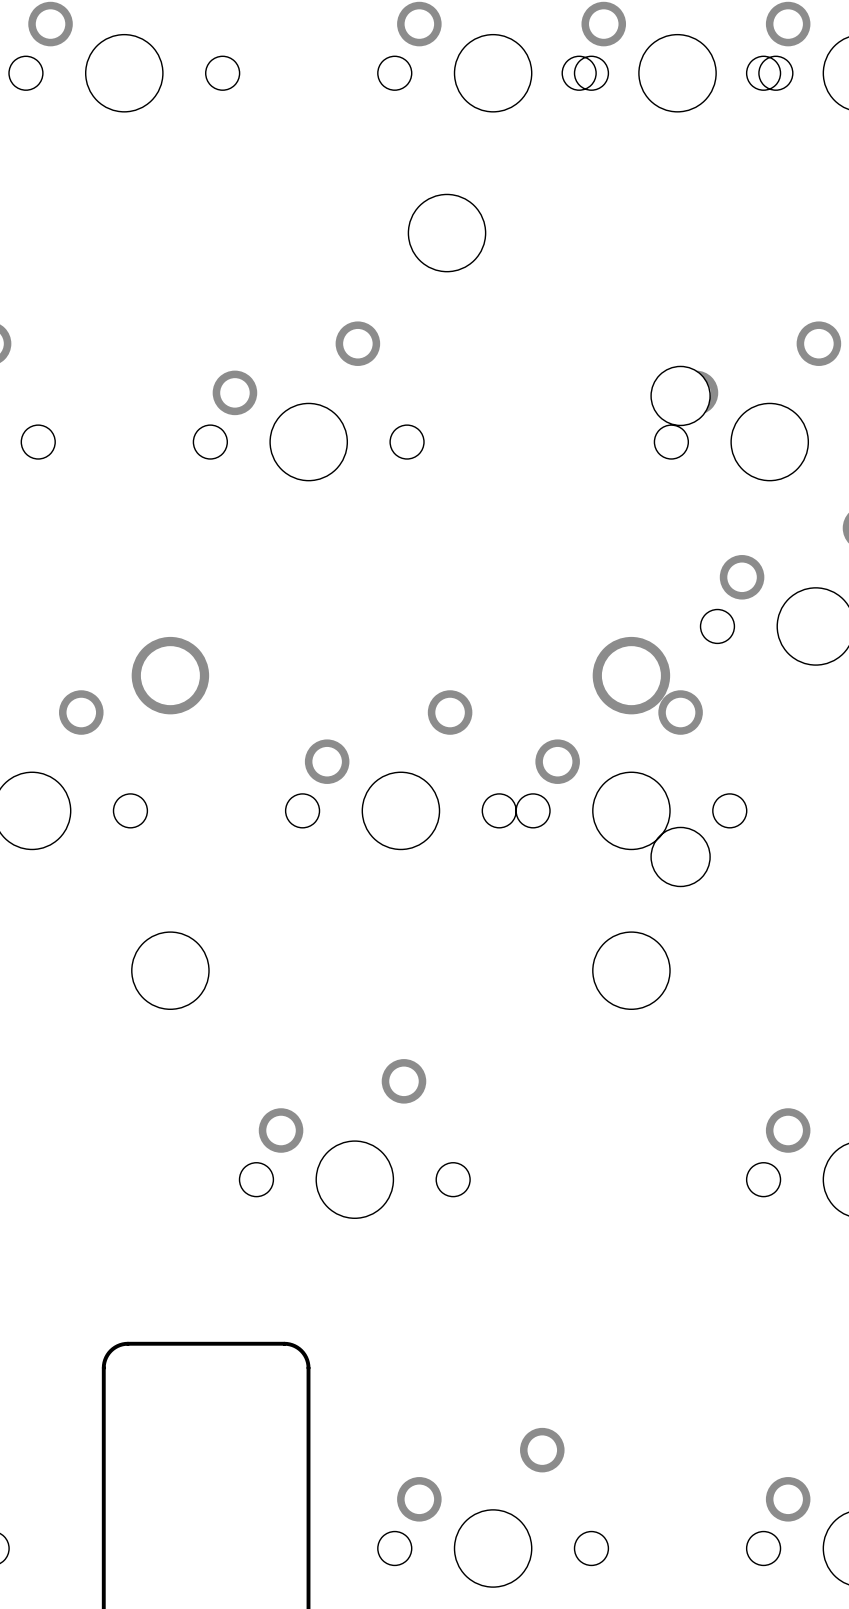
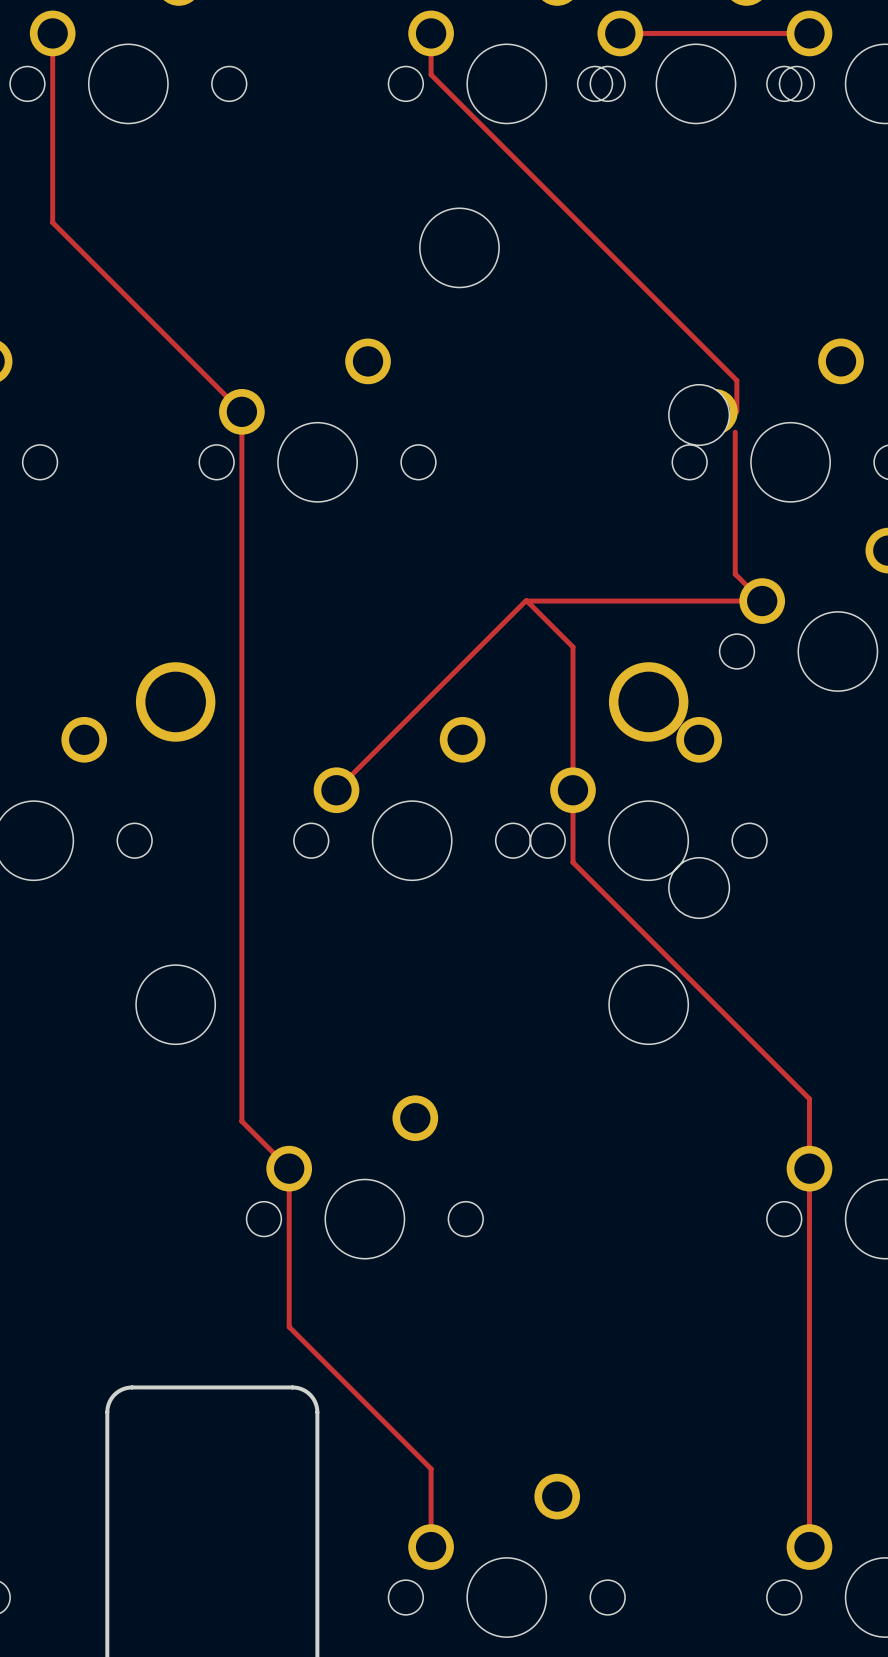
track: none -> (52, 33) (52, 222) (241, 411) (241, 1121) (289, 1168) (289, 1326) (431, 1468) (431, 1547)
track: none -> (431, 33) (431, 74) (736, 380) (736, 411)
track: none -> (620, 33) (809, 33)
track: none -> (735, 432) (735, 574) (762, 601) (525, 601) (336, 790)
track: none -> (526, 601) (572, 647) (572, 862) (809, 1098) (809, 1547)

